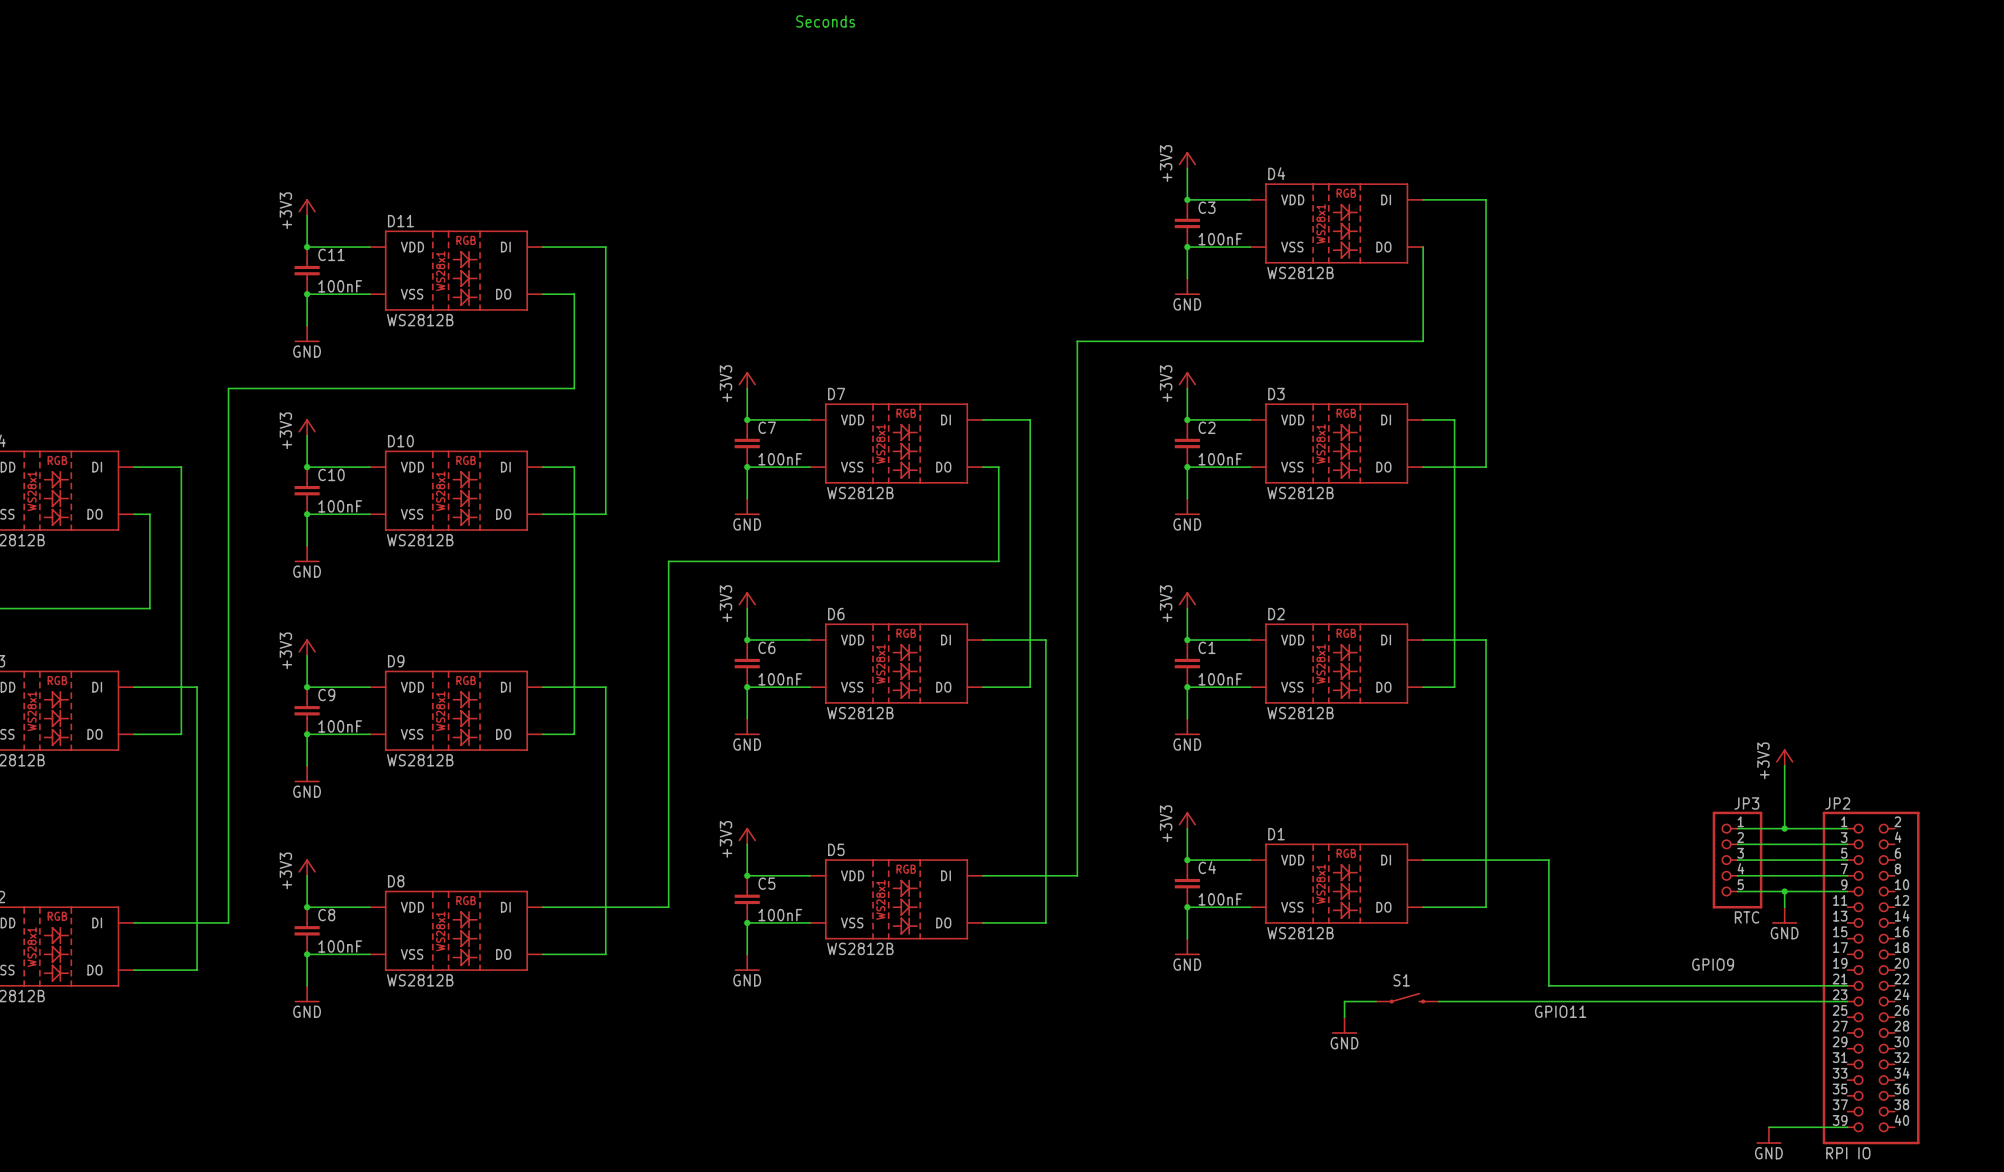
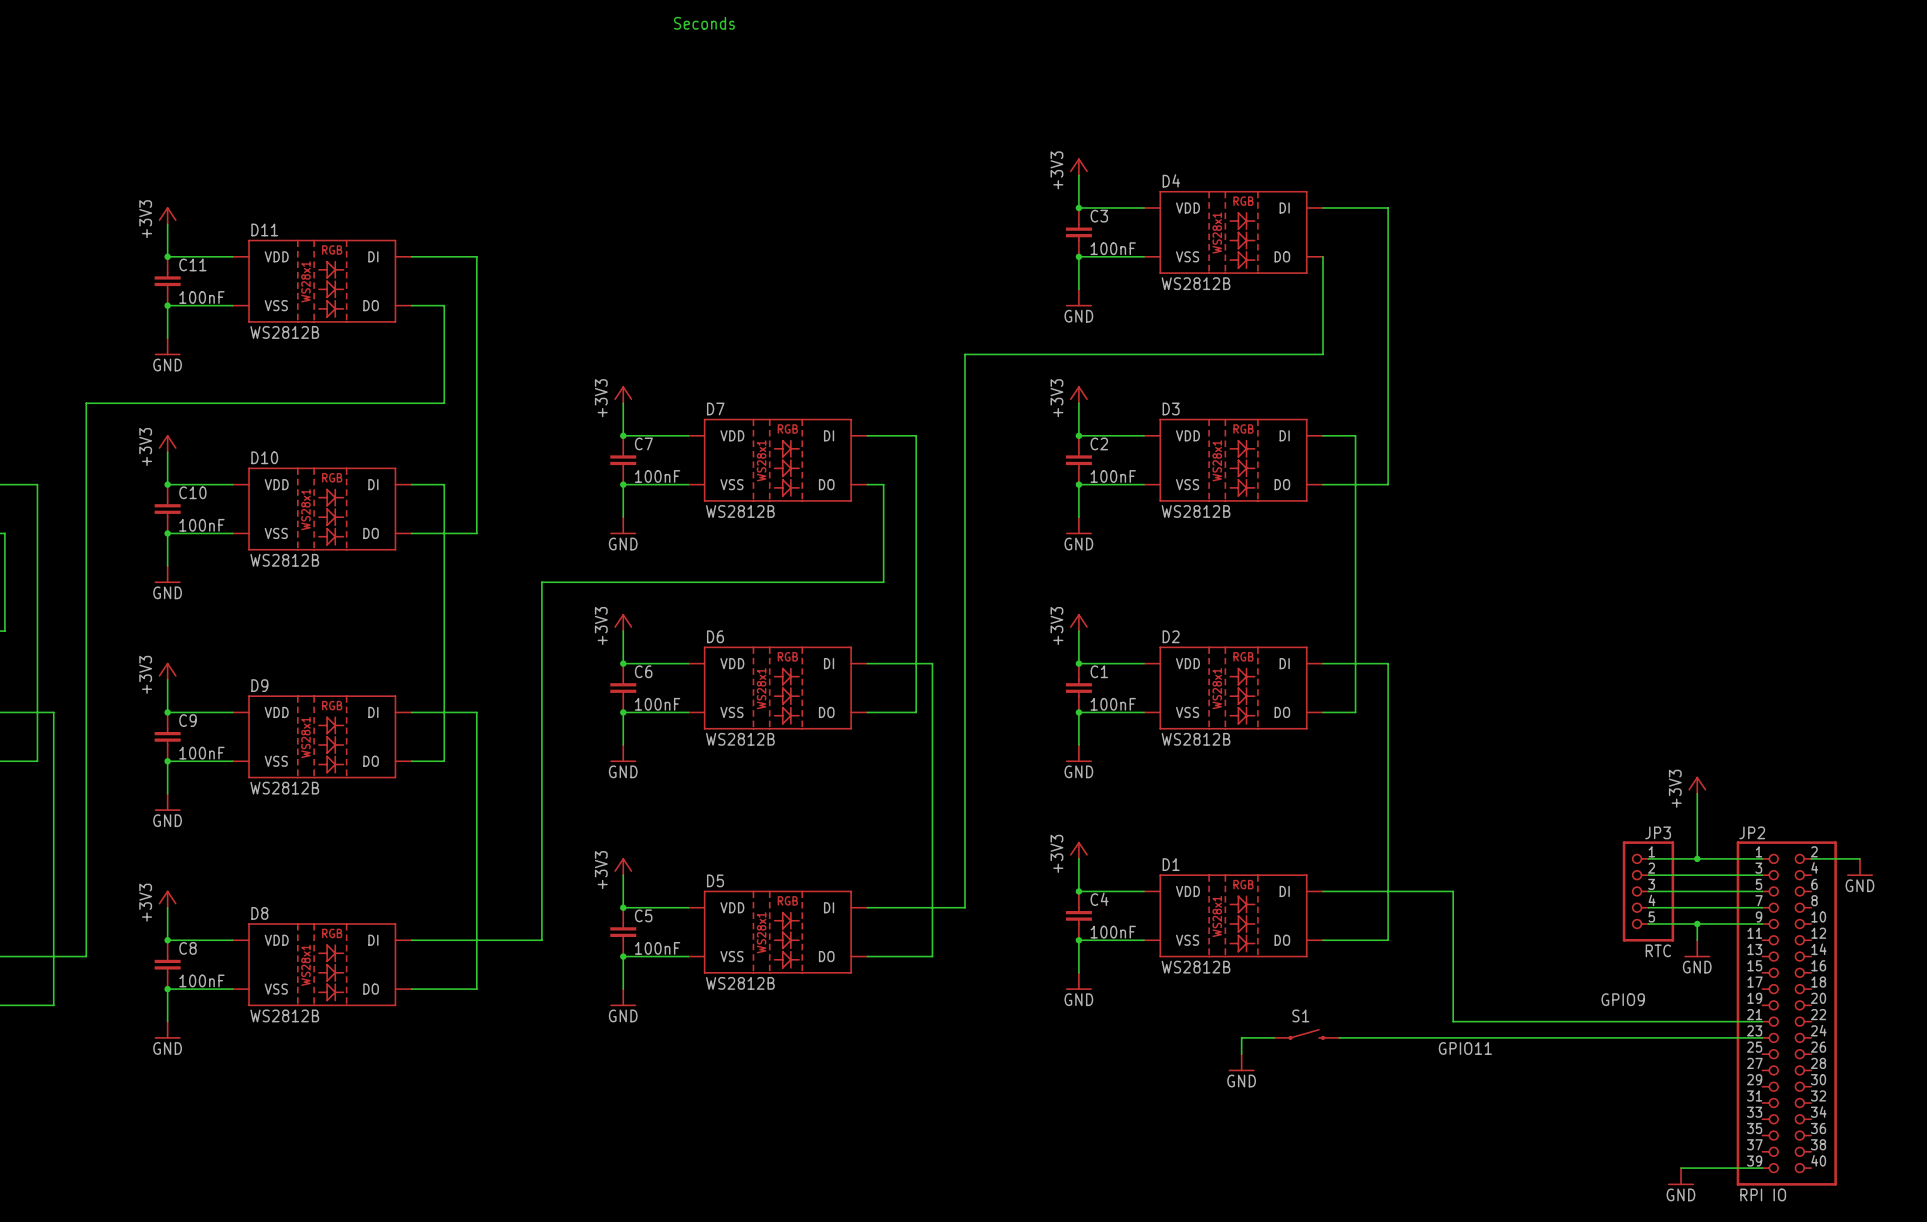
wire: none -> (1811, 858) (1860, 858)
power symbol: none -> GND (1860, 867)

